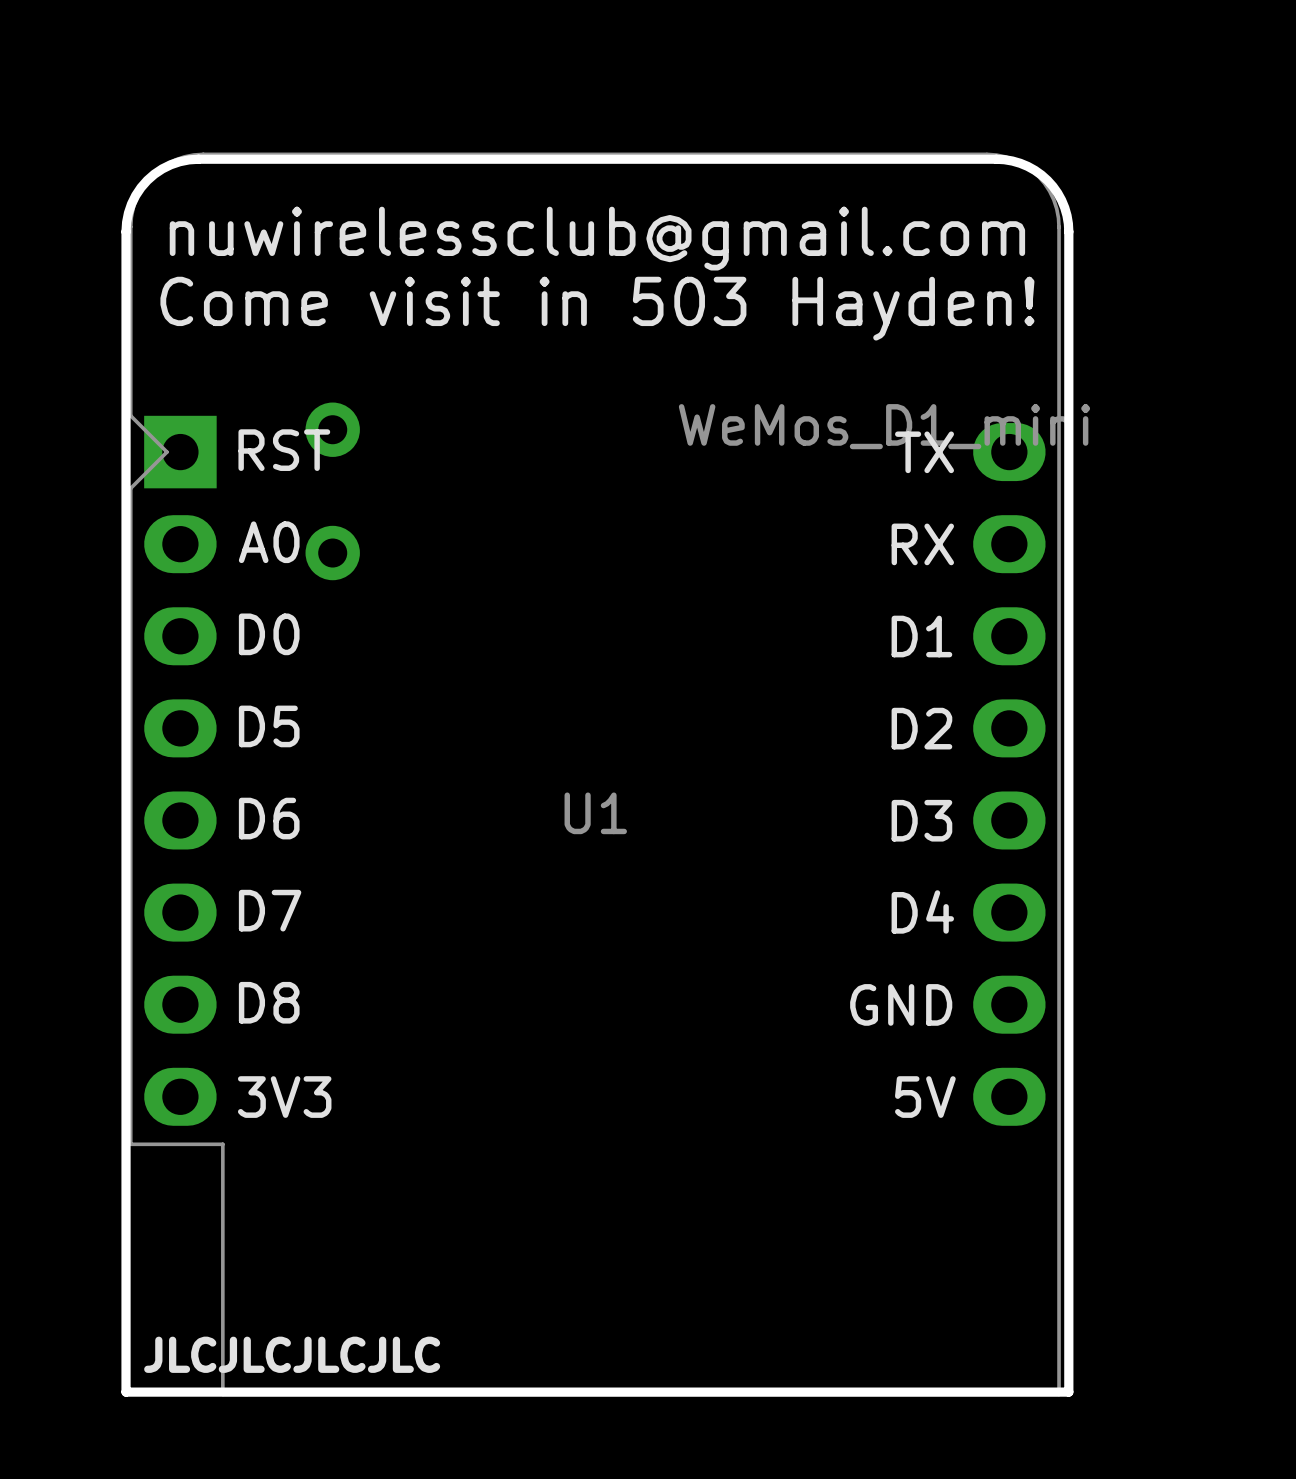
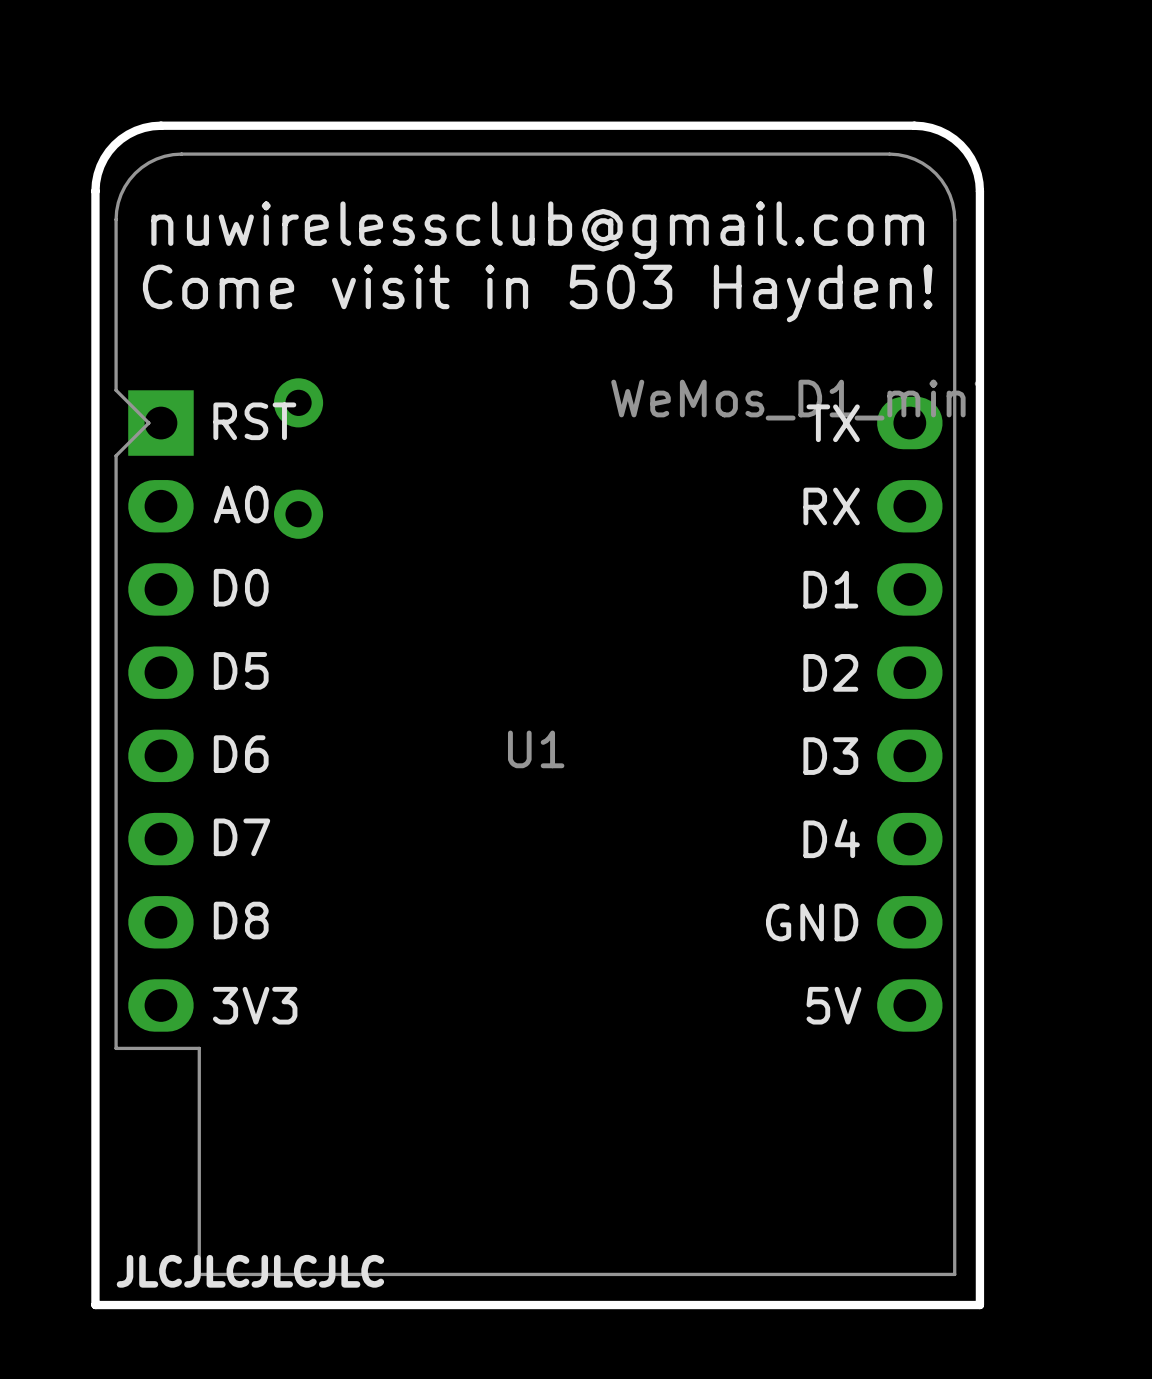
board edge: (996, 159) (198, 159) (179, 161) (162, 168) (141, 187) (131, 203) (126, 231) (126, 1392) (1068, 1392) (1068, 223) (1061, 200) (1047, 180) (1034, 170) (1020, 163) (996, 159) -> (914, 125) (939, 130) (960, 144) (974, 166) (979, 191) (979, 1305) (95, 1305) (95, 191) (97, 174) (108, 151) (121, 139) (135, 130) (160, 125) (914, 125)
text position: JLCJLCJLCJLC (292, 1354) -> JLCJLCJLCJLC (250, 1271)

